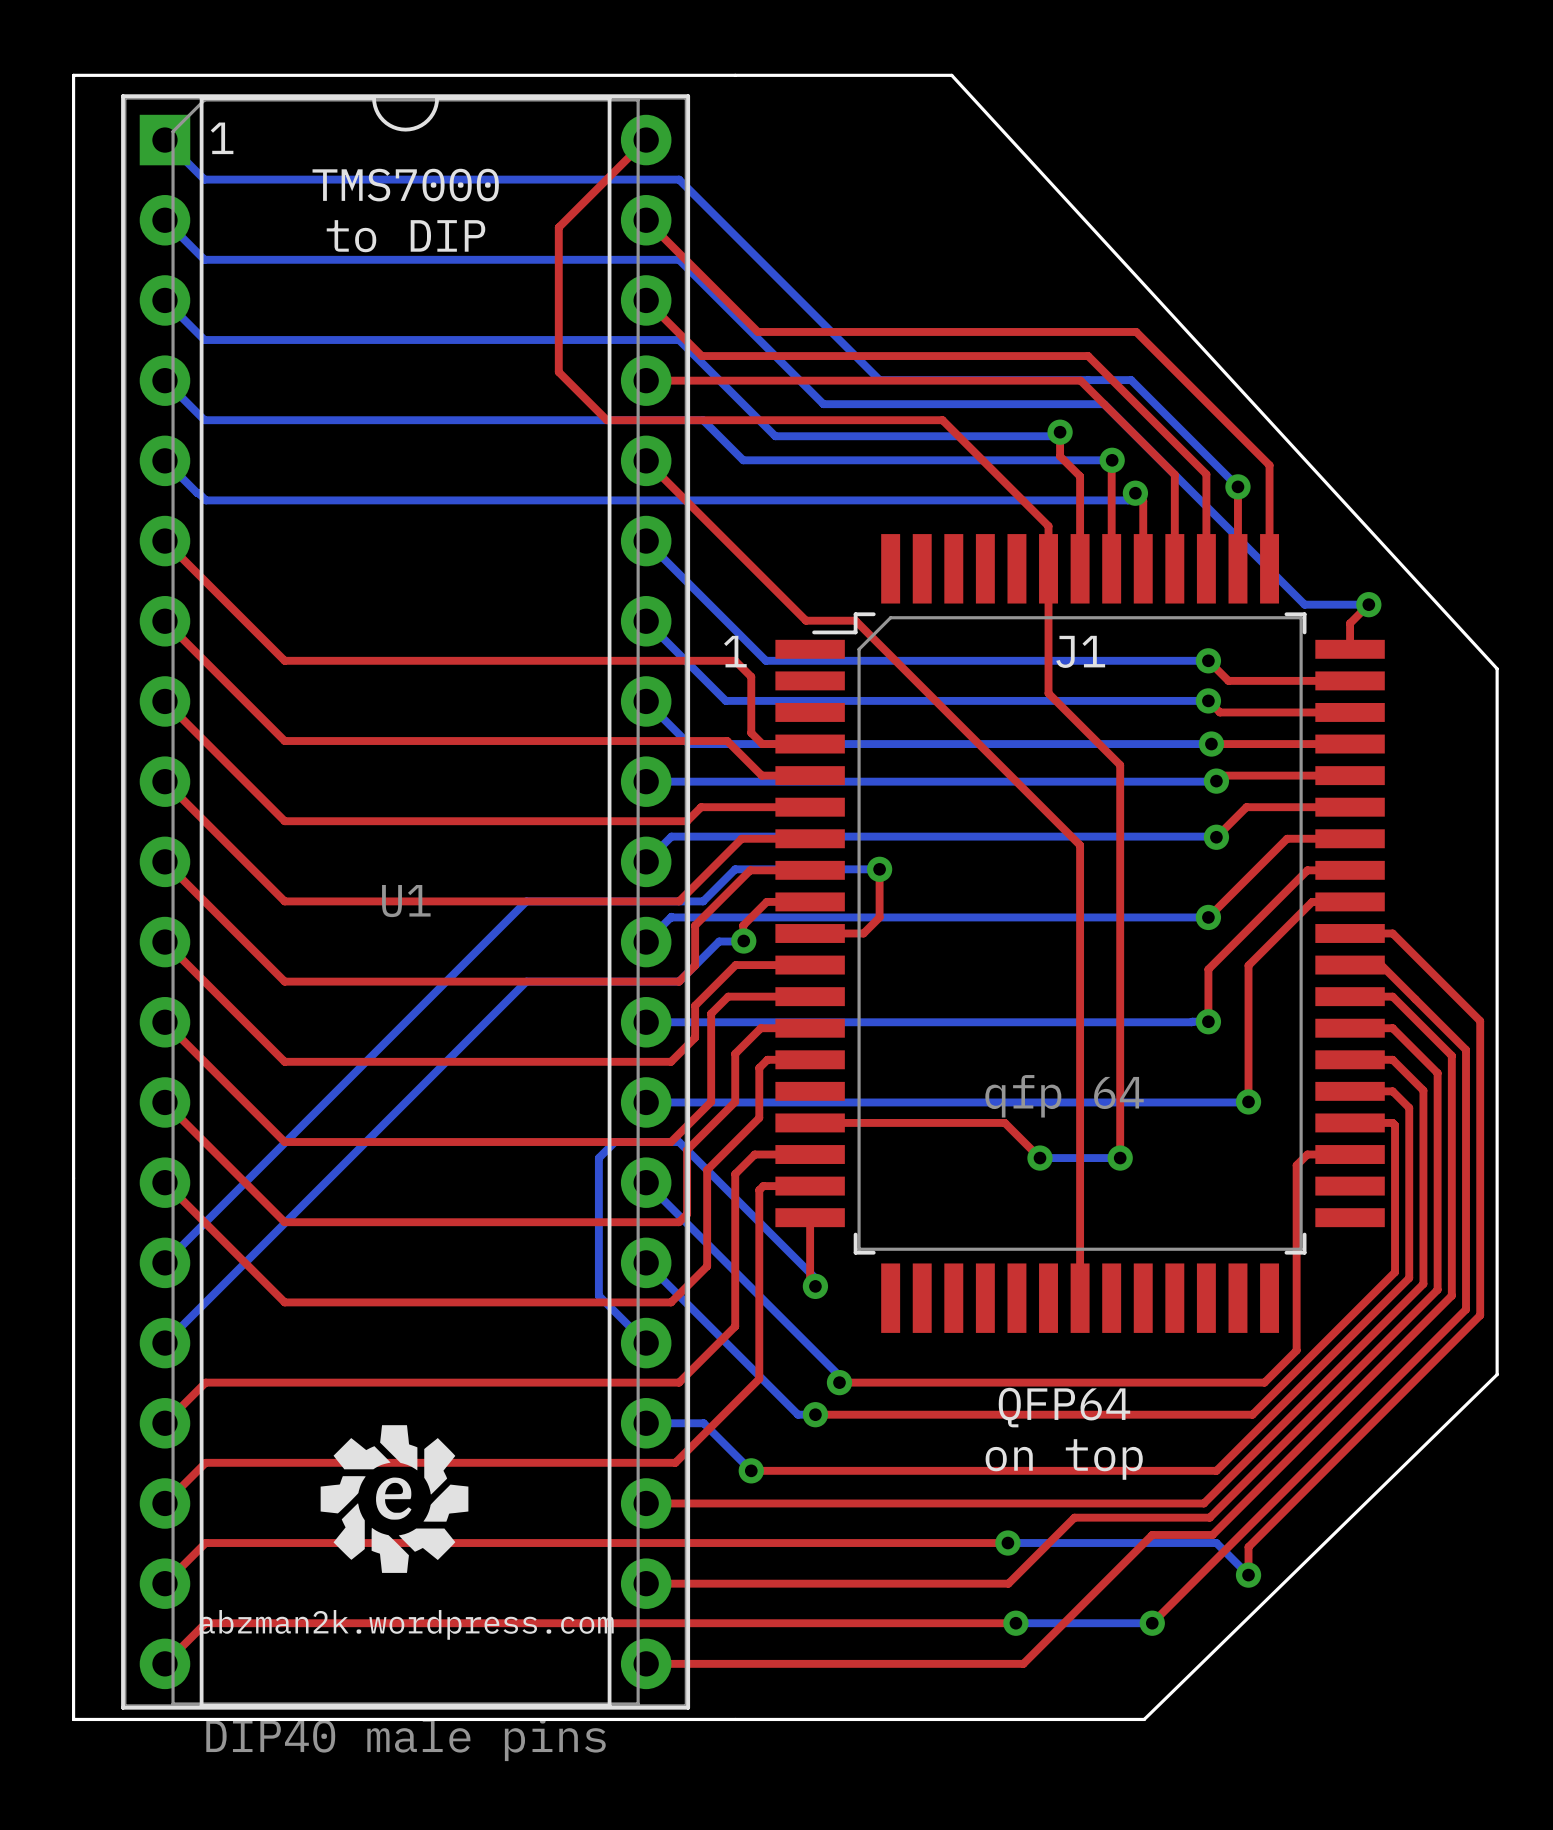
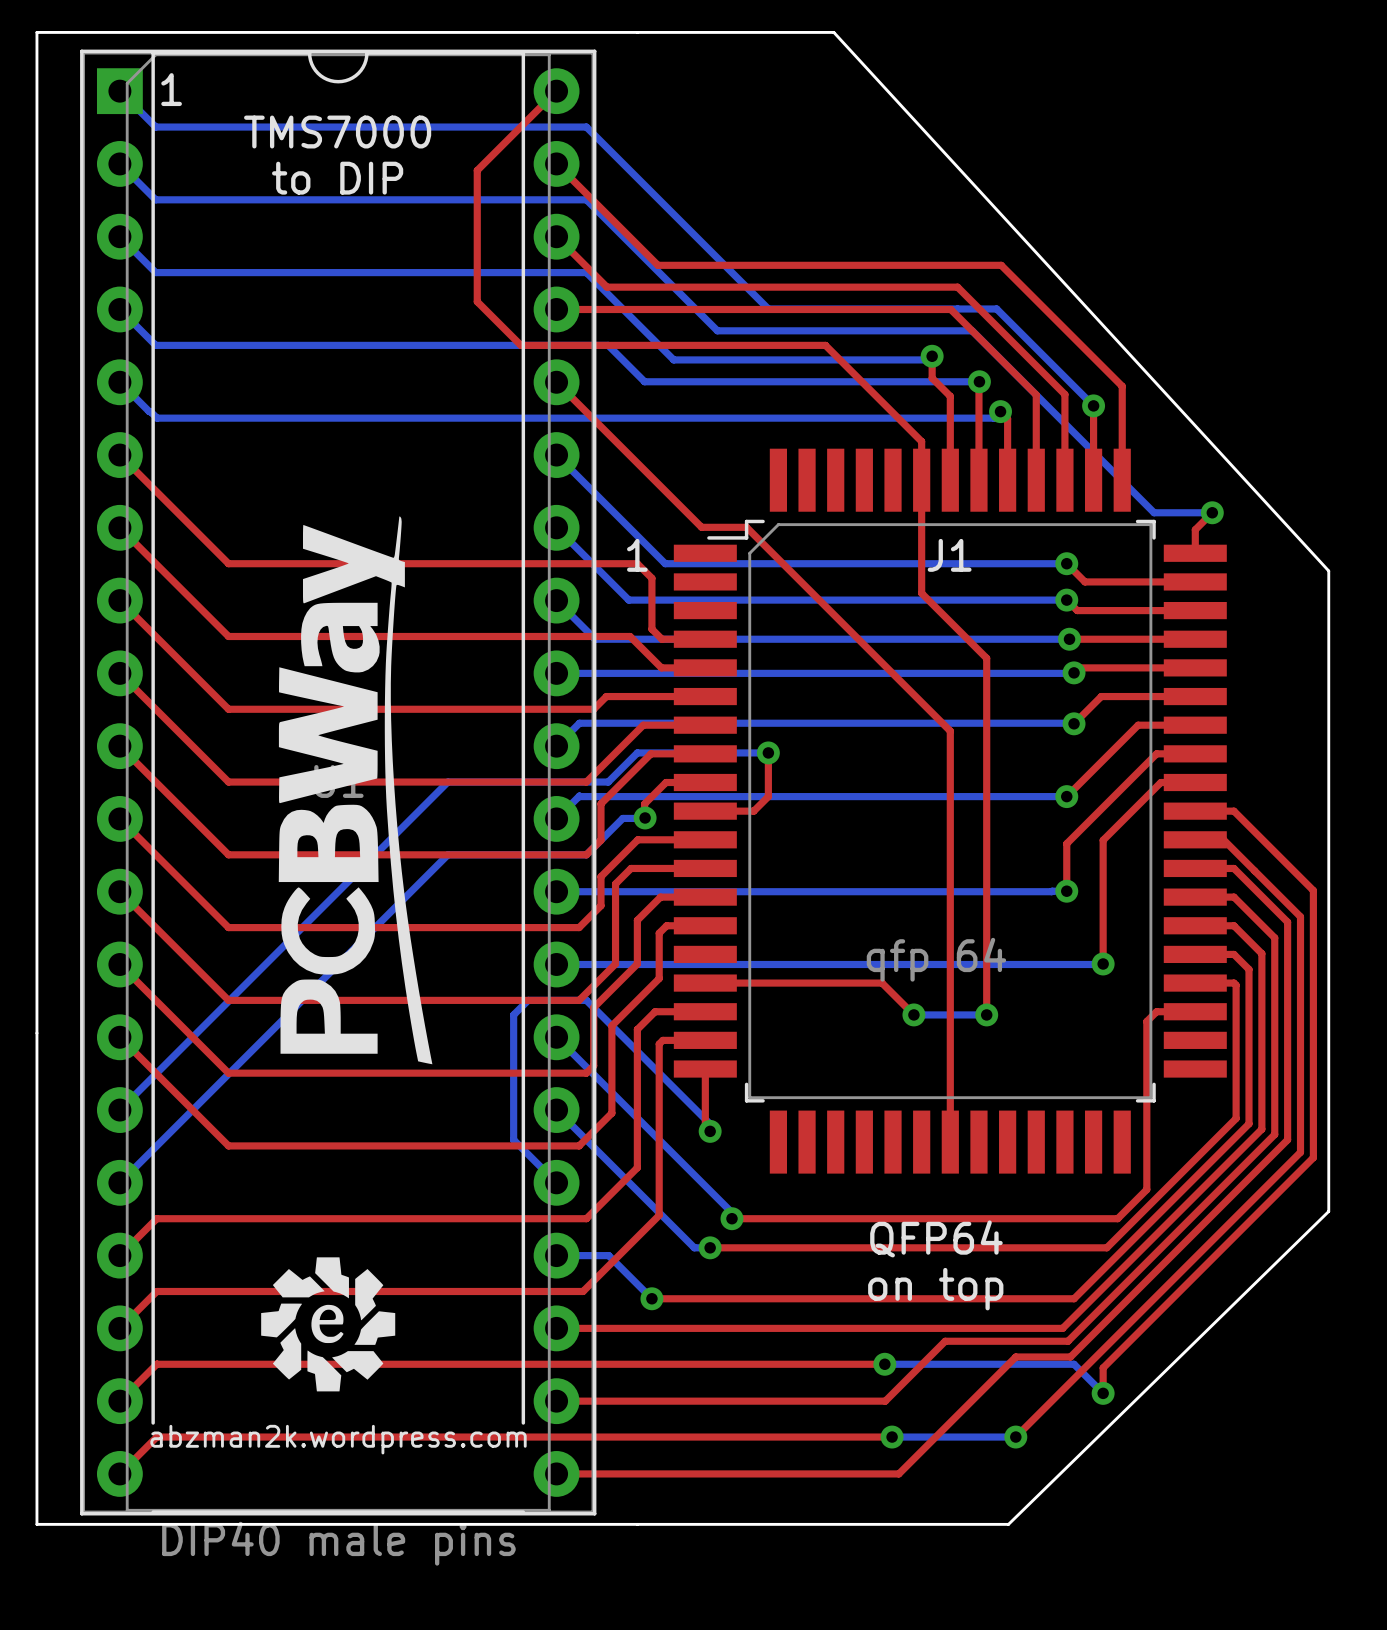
U1 footprint: [121, 94, 691, 1710] -> [80, 49, 597, 1516]
drawing: none -> [278, 516, 433, 1065]

